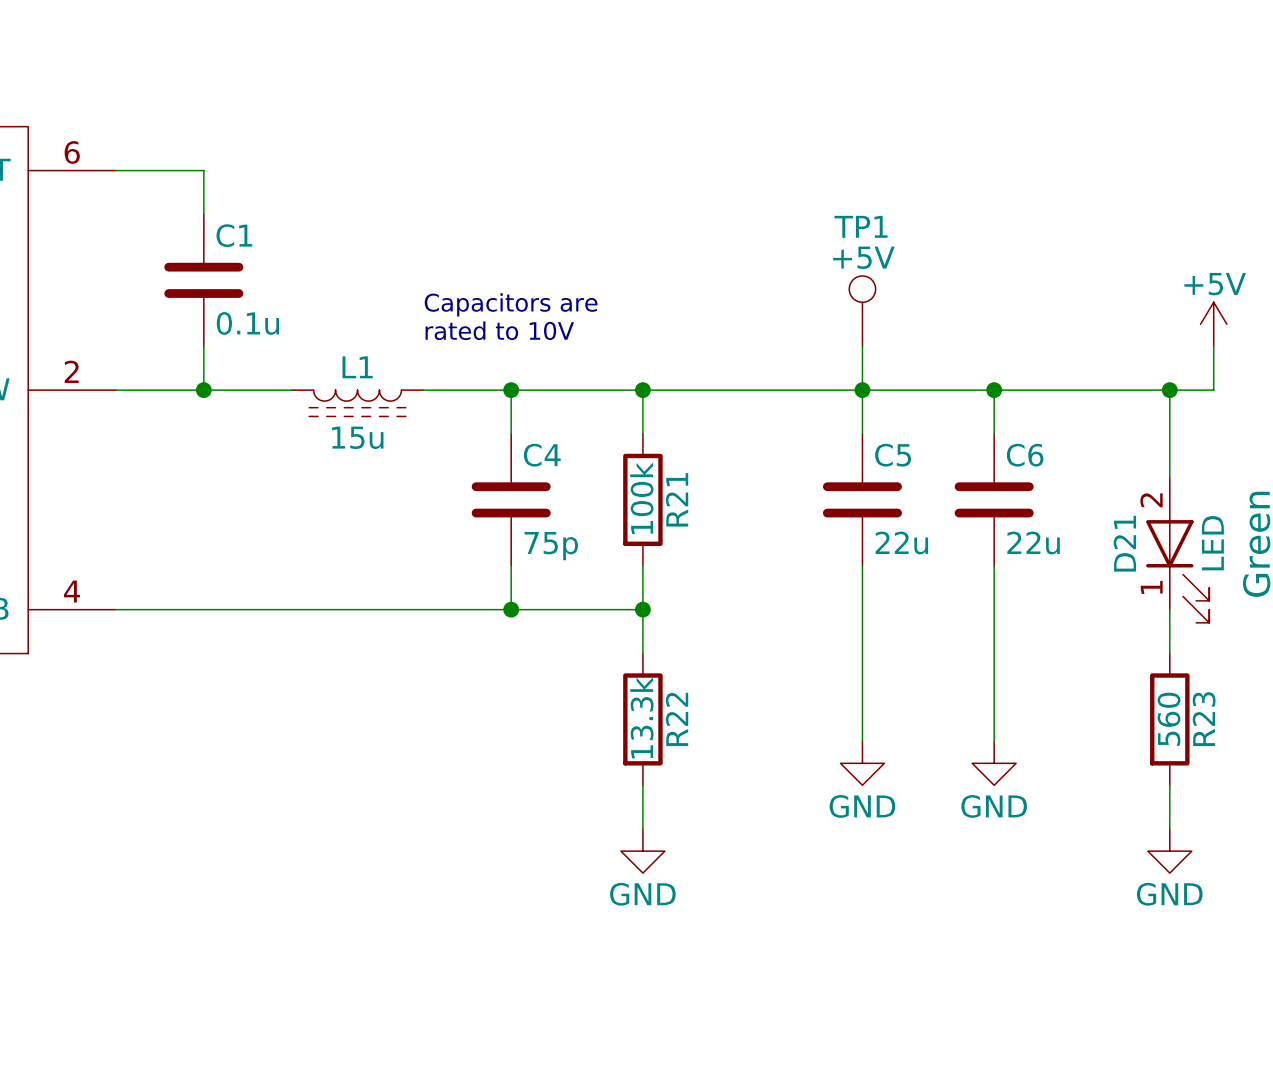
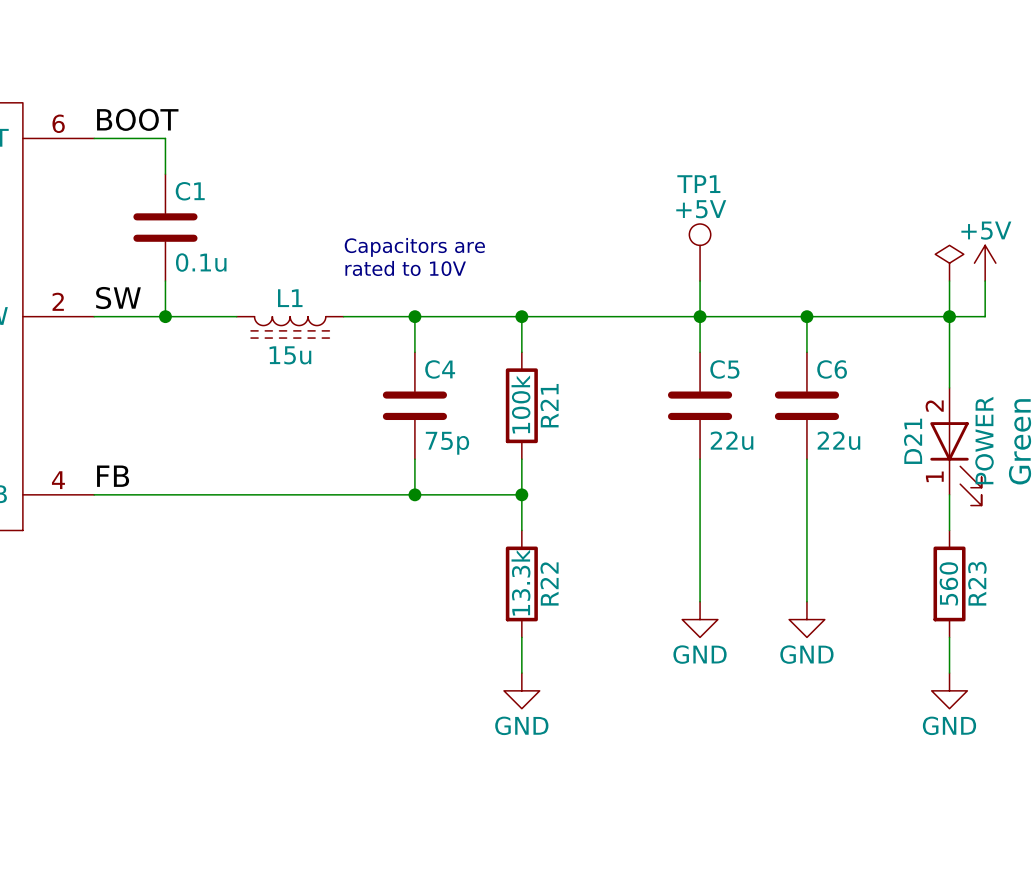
label: none -> BOOT (137, 119)
power symbol: none -> (949, 263)
wire: none -> (949, 281) (949, 316)
label: none -> SW (118, 298)
D21 value: LED (1212, 543) -> POWER (984, 440)
label: none -> FB (113, 476)

